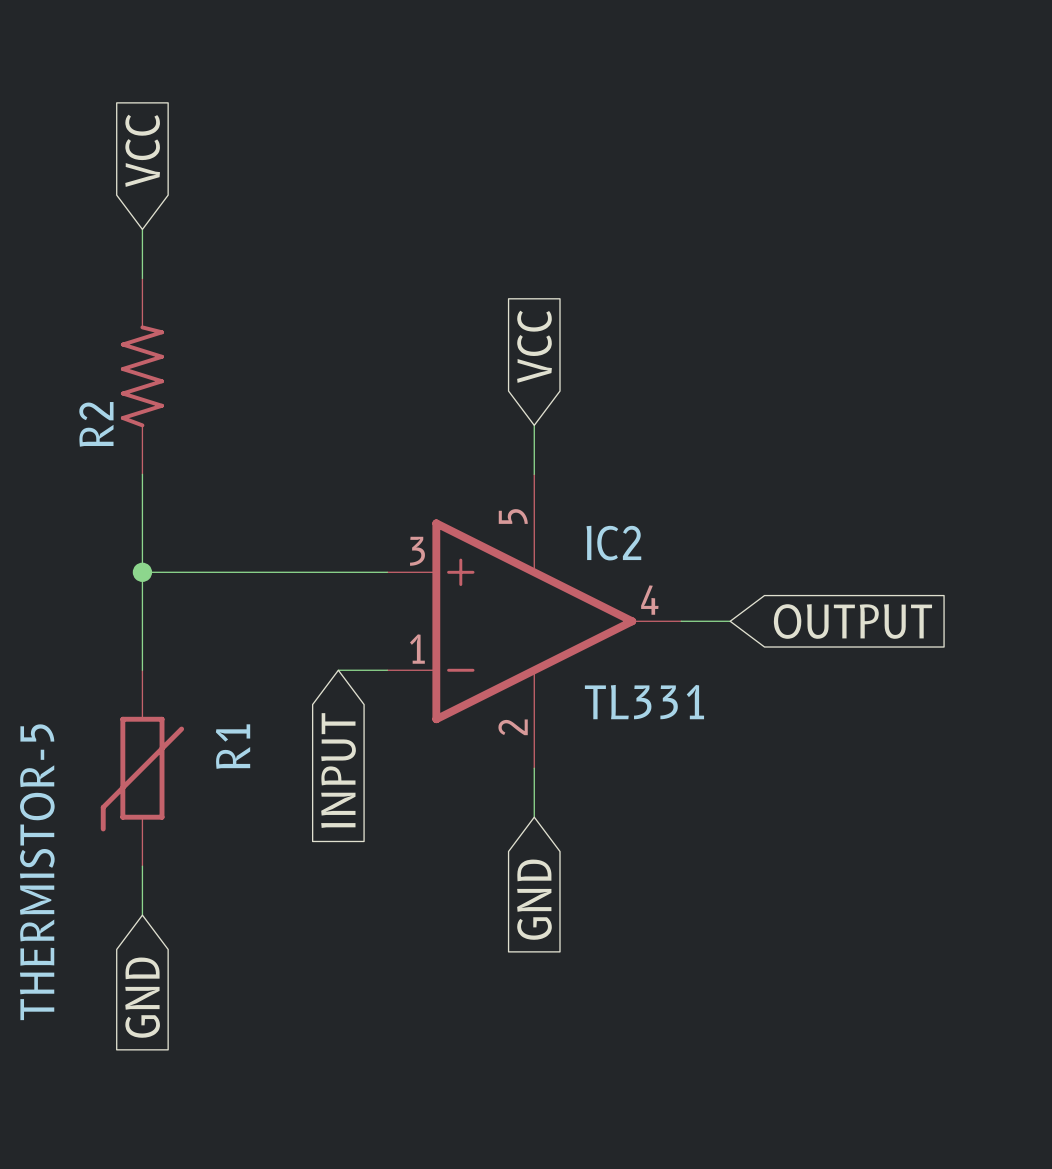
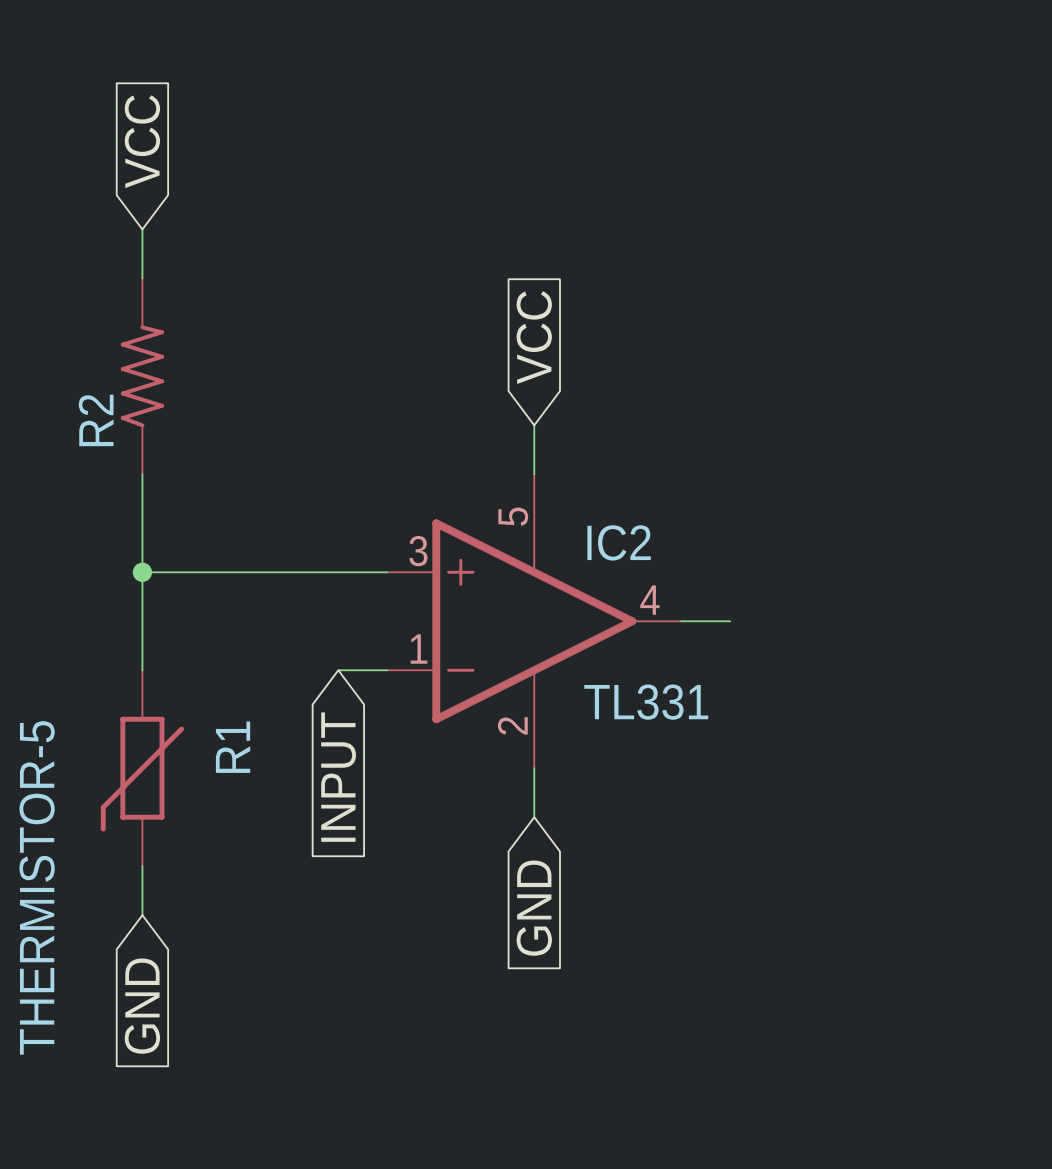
global label: OUTPUT (852, 621) -> none

